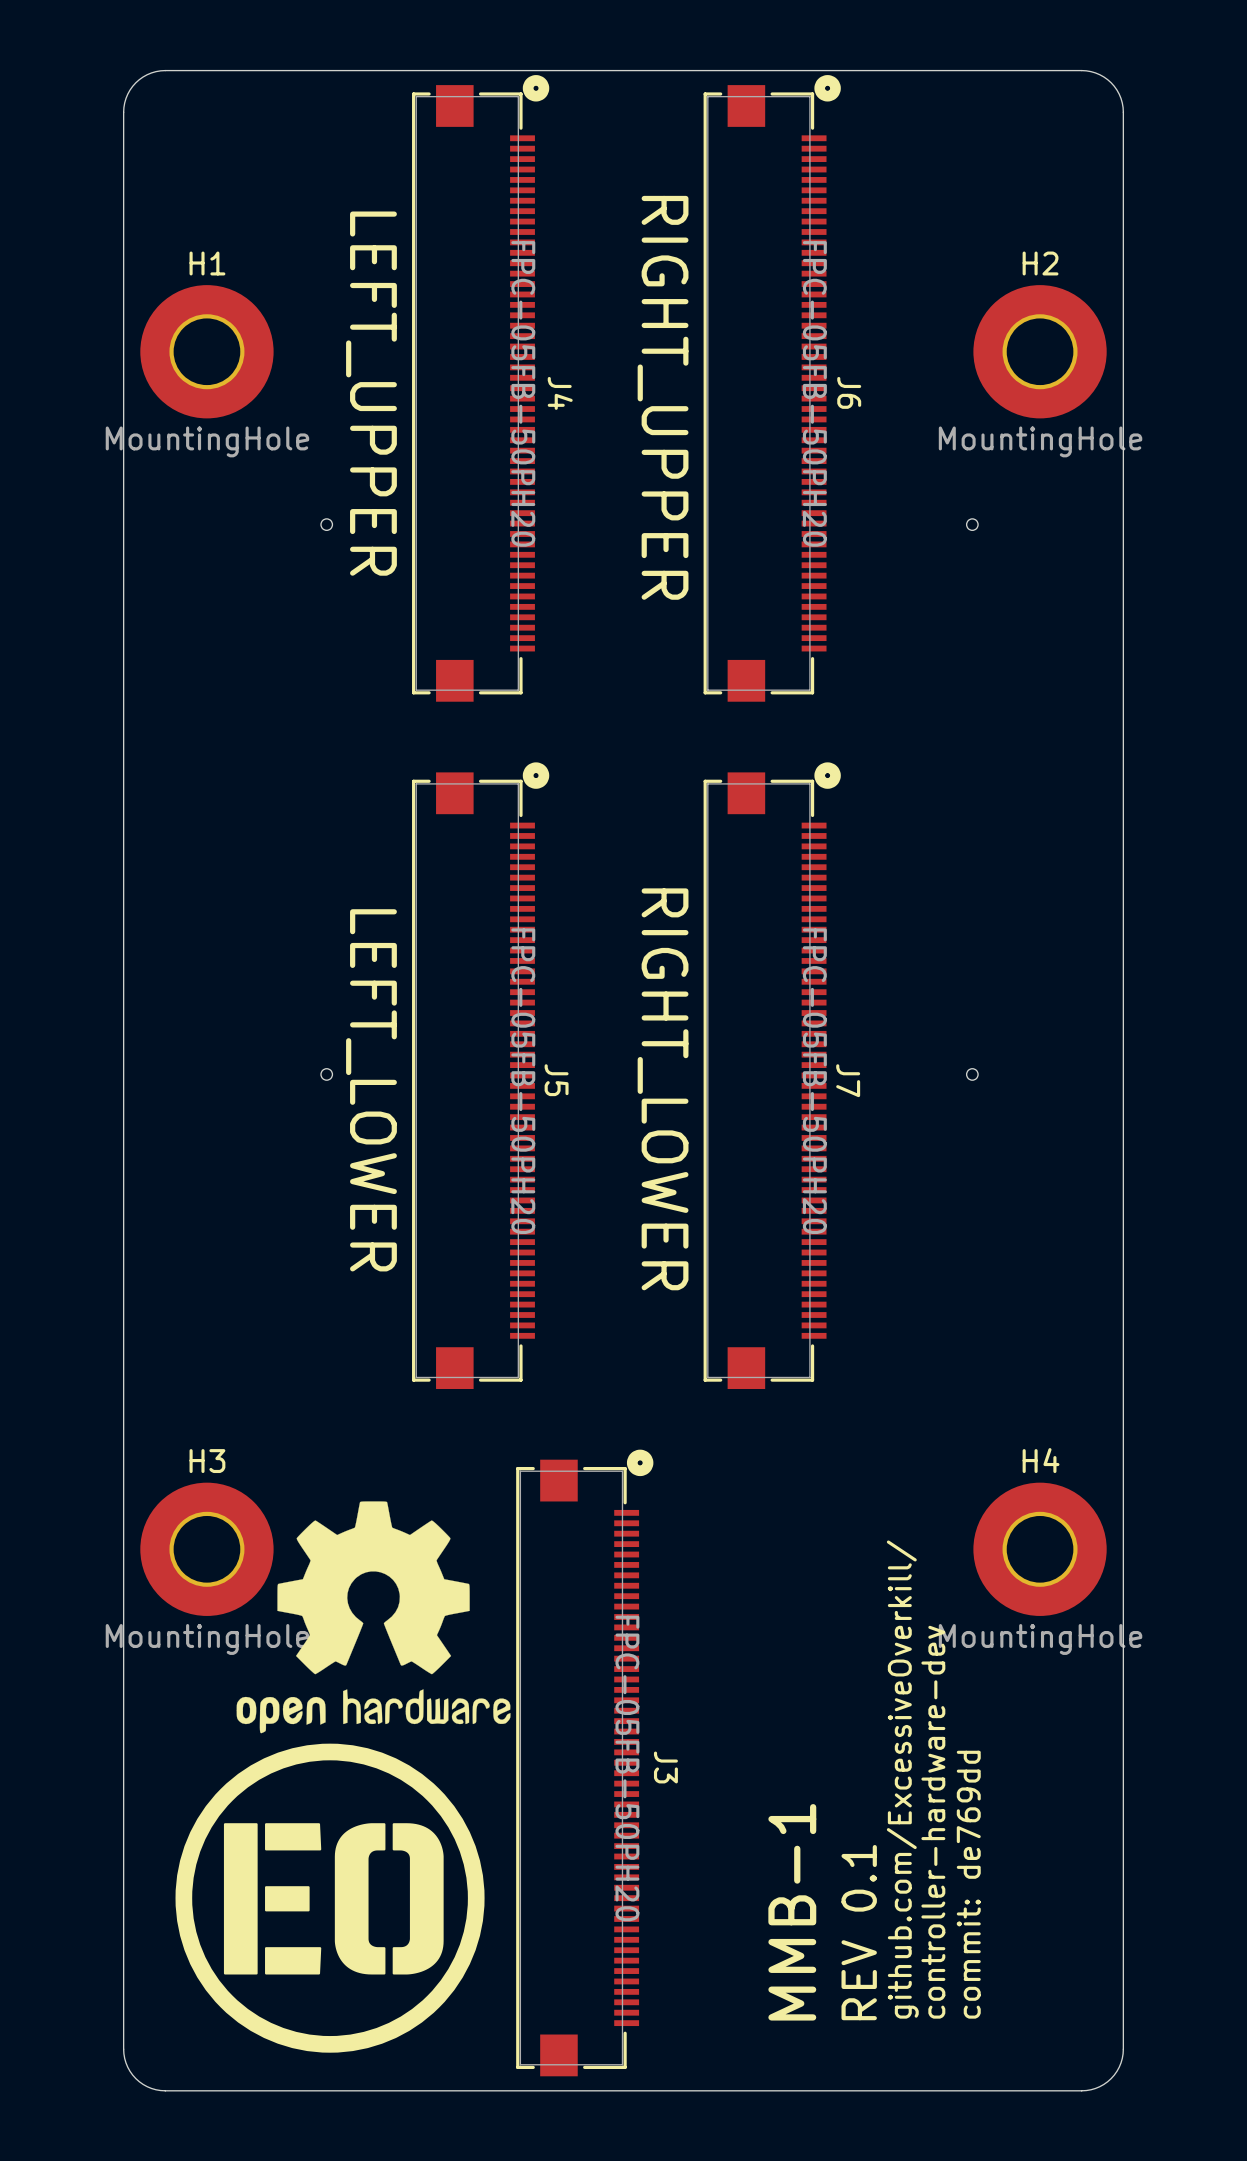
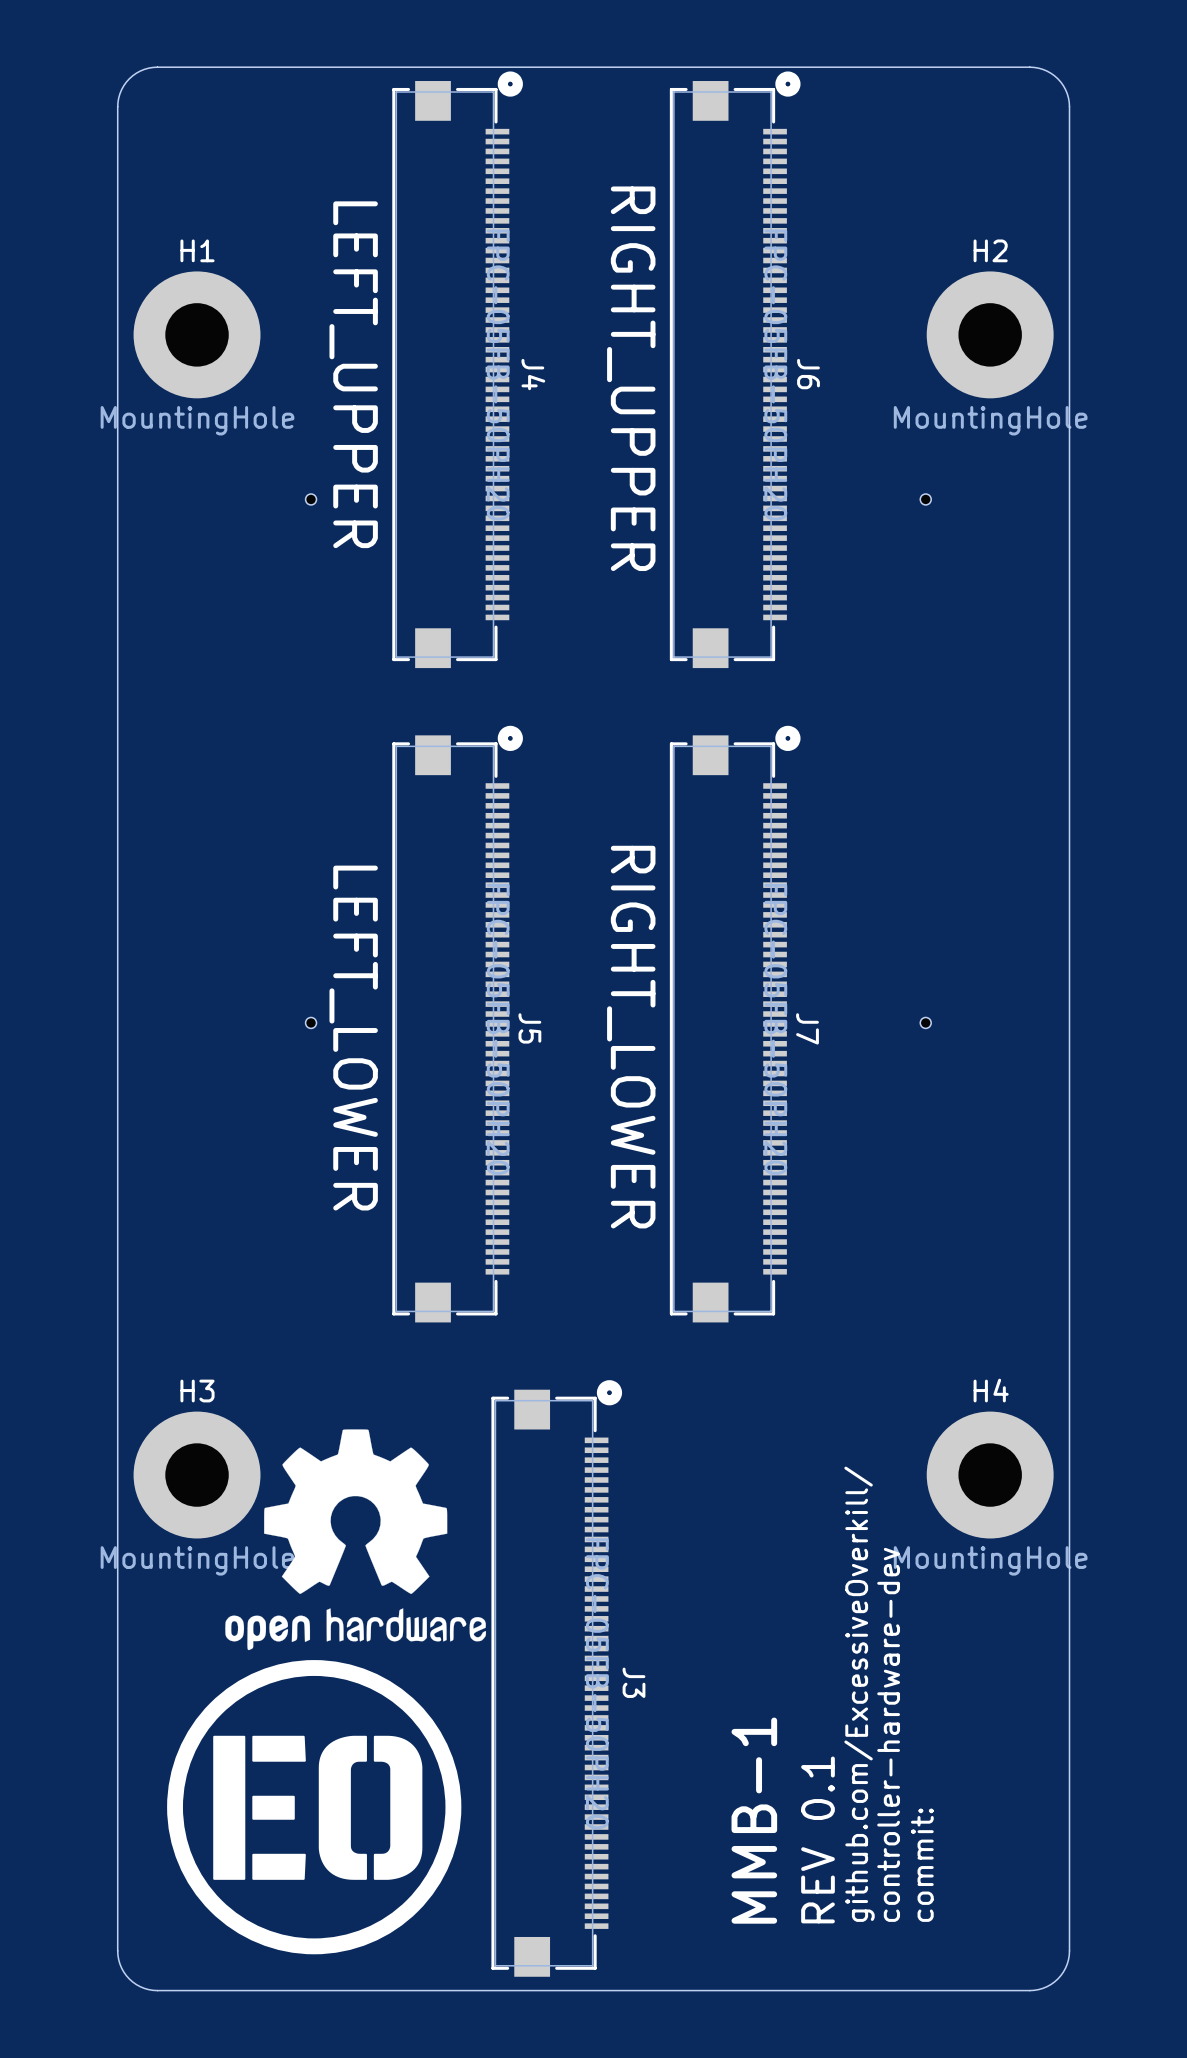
text: commit: de769dd (968, 1884) -> commit: (922, 1865)

